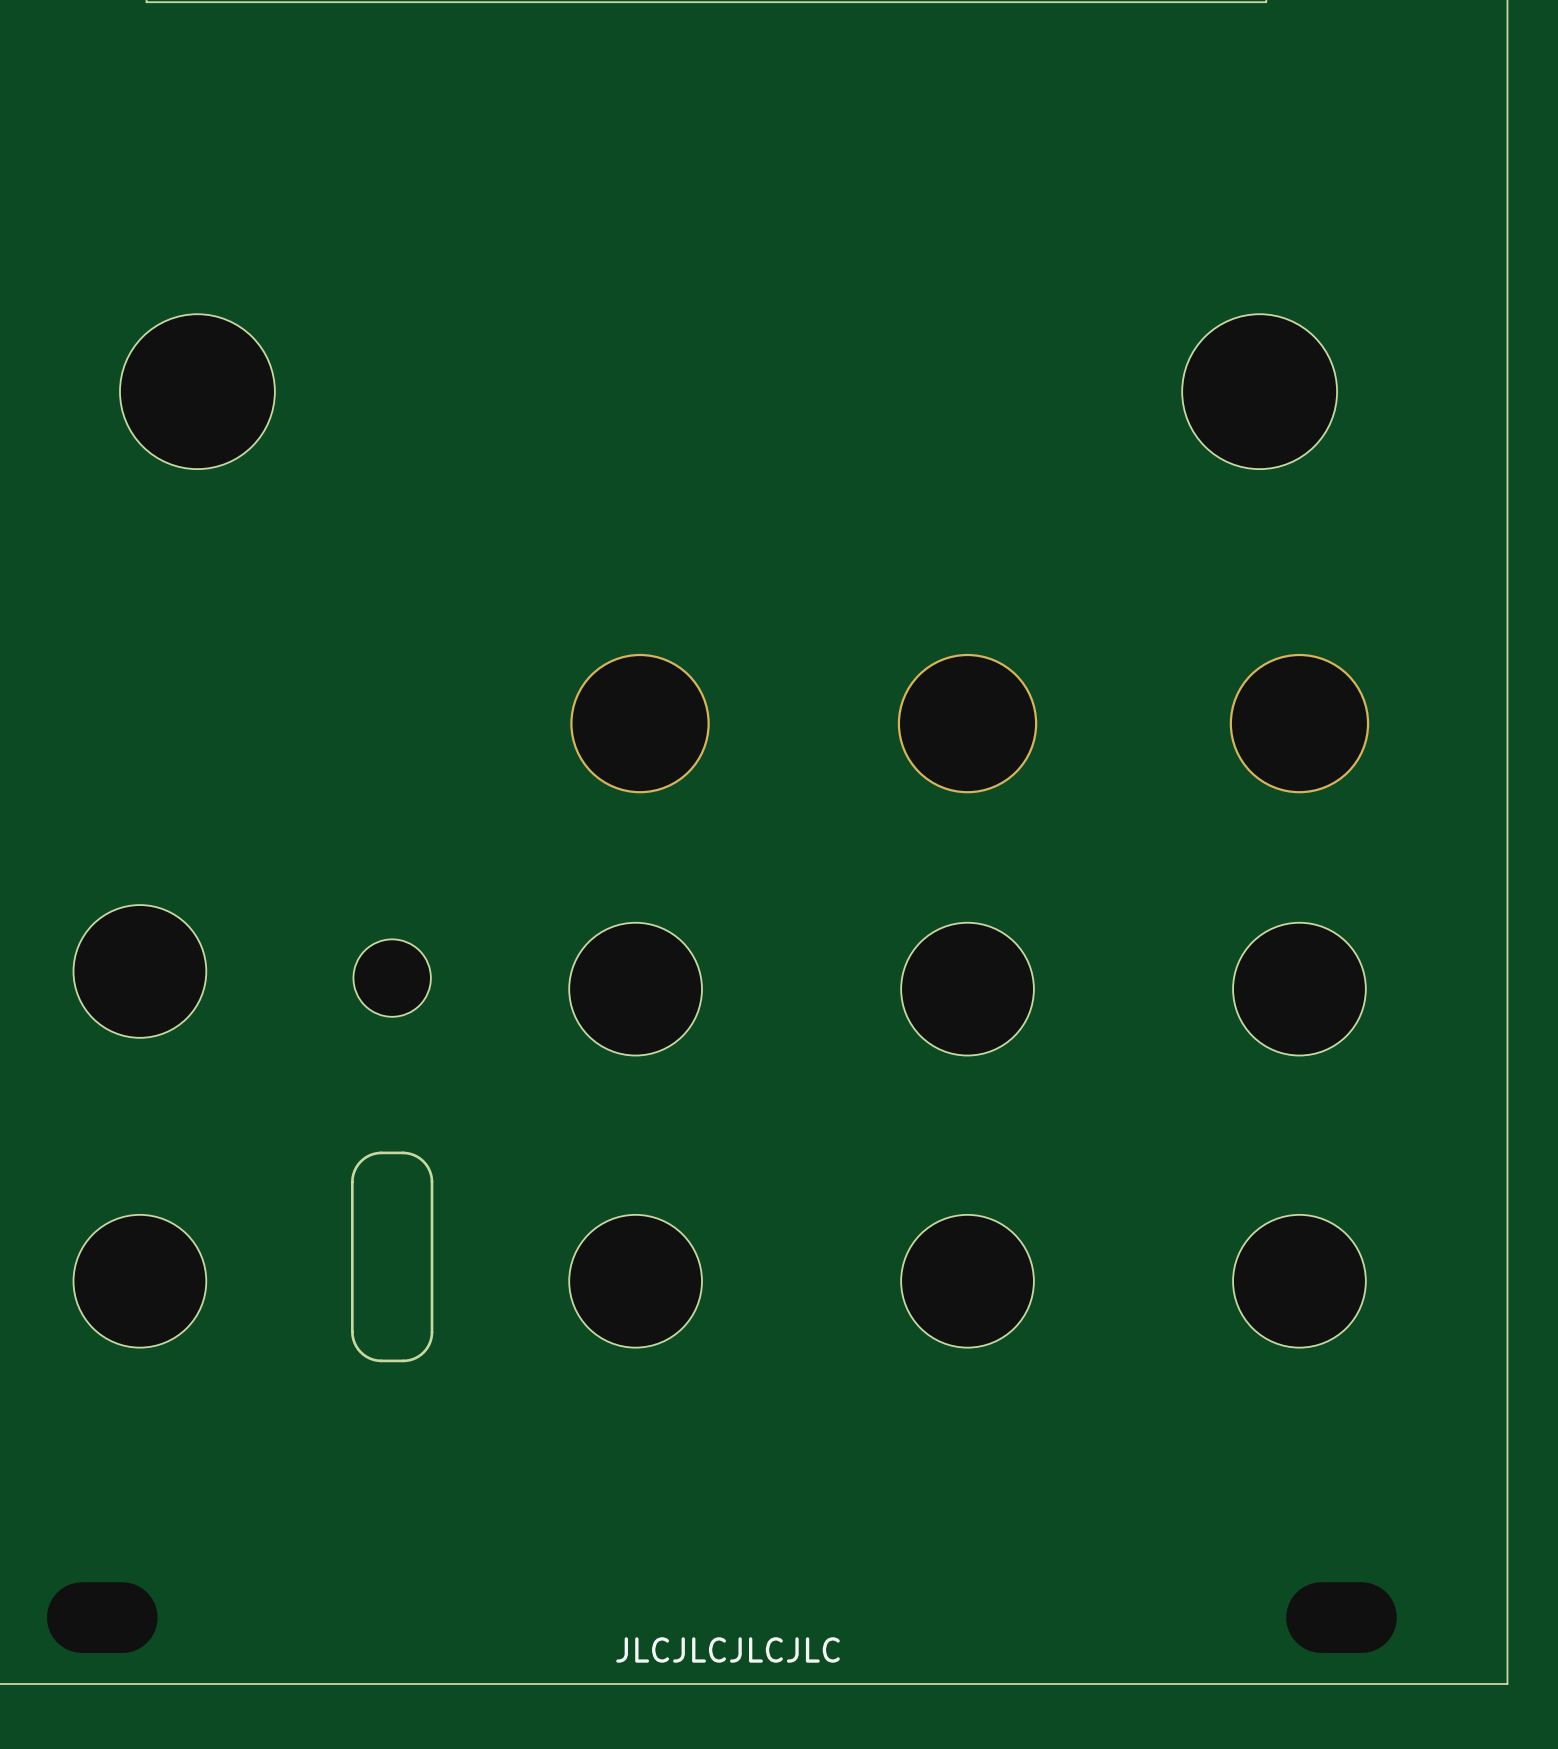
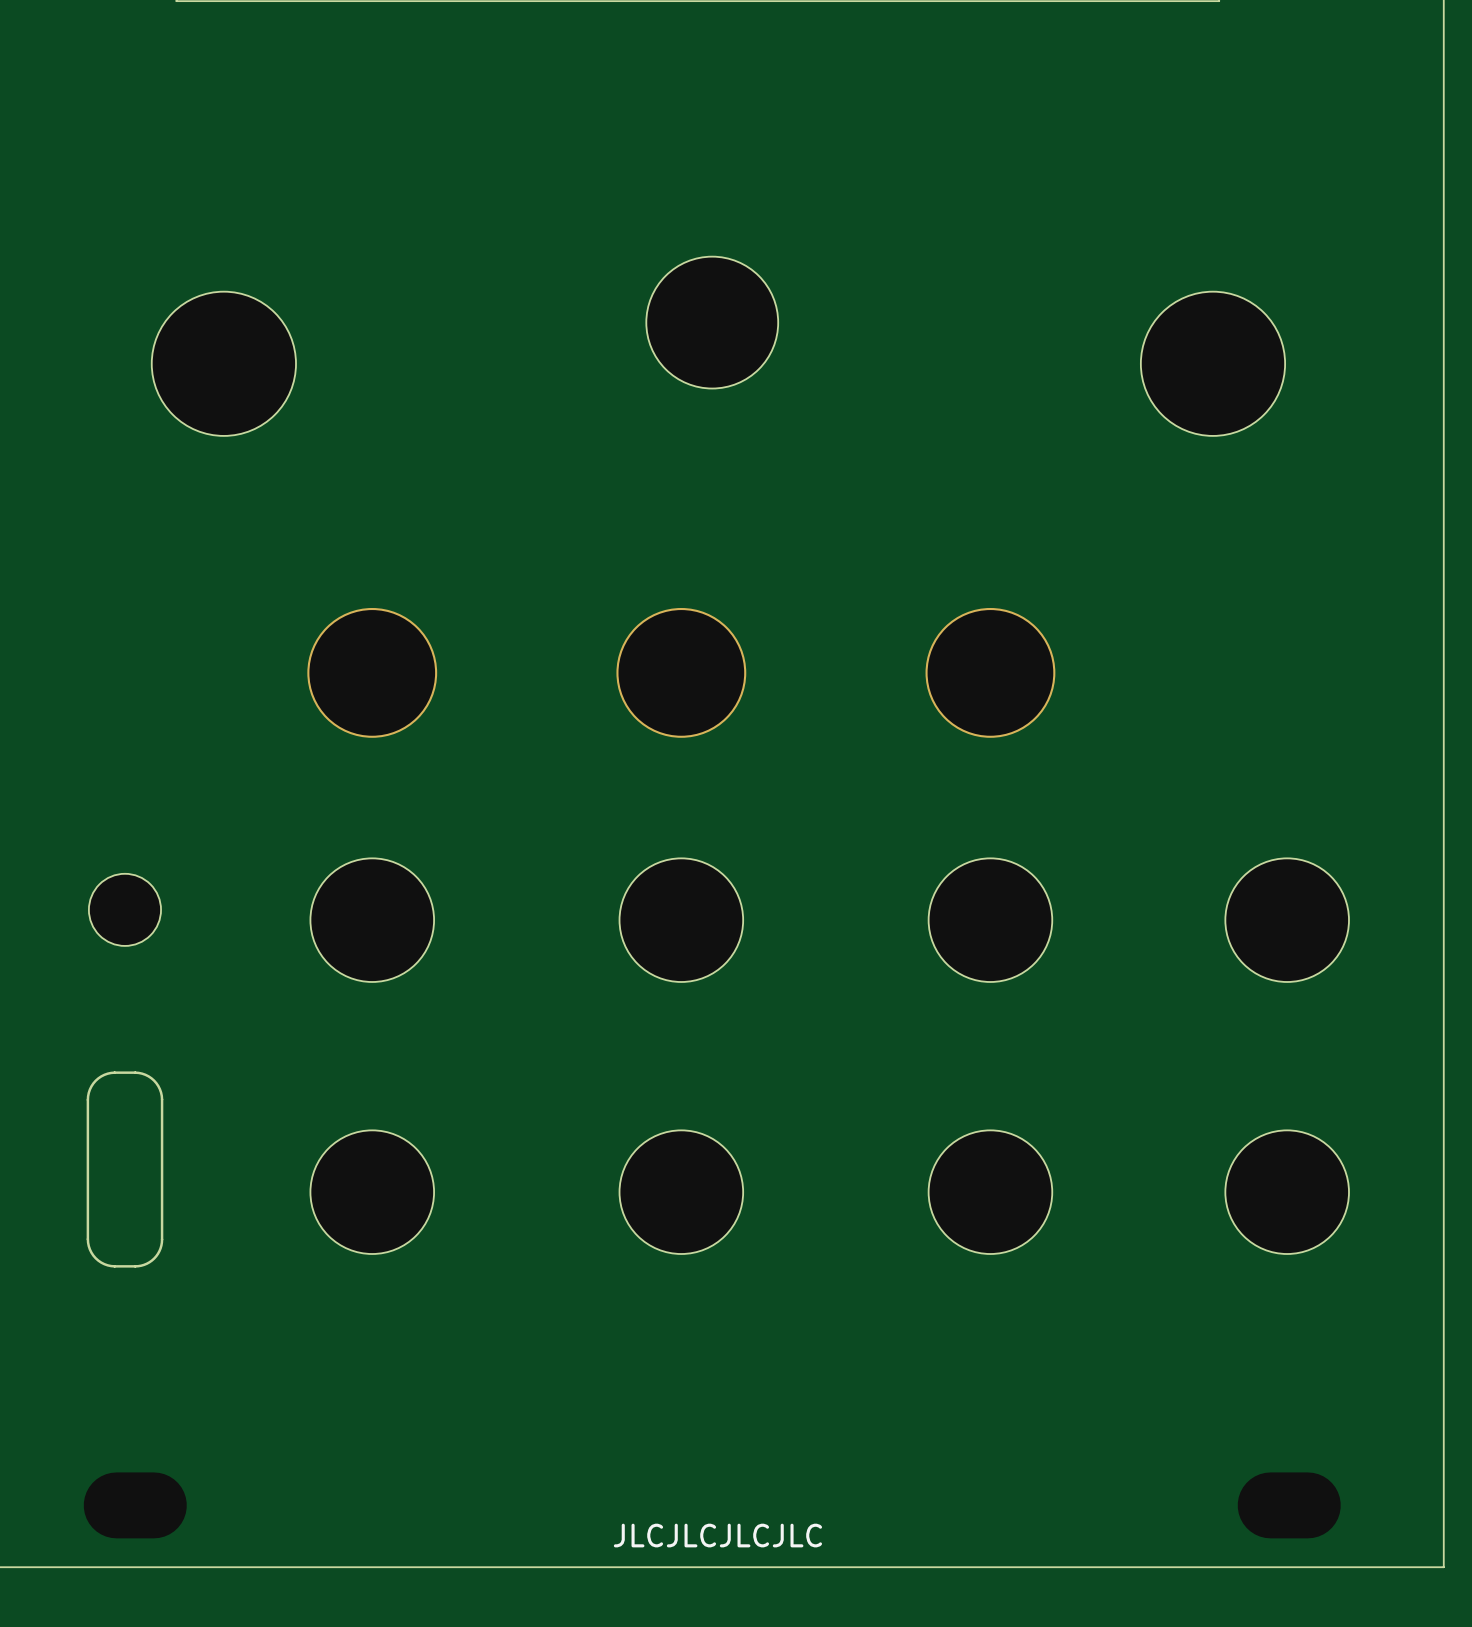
part: none -> (712, 322)
part: none -> (372, 672)
part position: (640, 723) -> (681, 672)
part position: (967, 723) -> (990, 672)
part: (1299, 723) -> none
part: (139, 971) -> none
part position: (392, 978) -> (124, 909)
part: none -> (372, 920)
part position: (635, 989) -> (681, 920)
part position: (967, 989) -> (990, 920)
part position: (1299, 989) -> (1287, 920)
drawing position: (392, 1256) -> (124, 1169)
part: (139, 1281) -> none
part: none -> (372, 1192)
part position: (635, 1281) -> (681, 1192)
part position: (967, 1281) -> (990, 1192)
part position: (1299, 1281) -> (1287, 1192)

